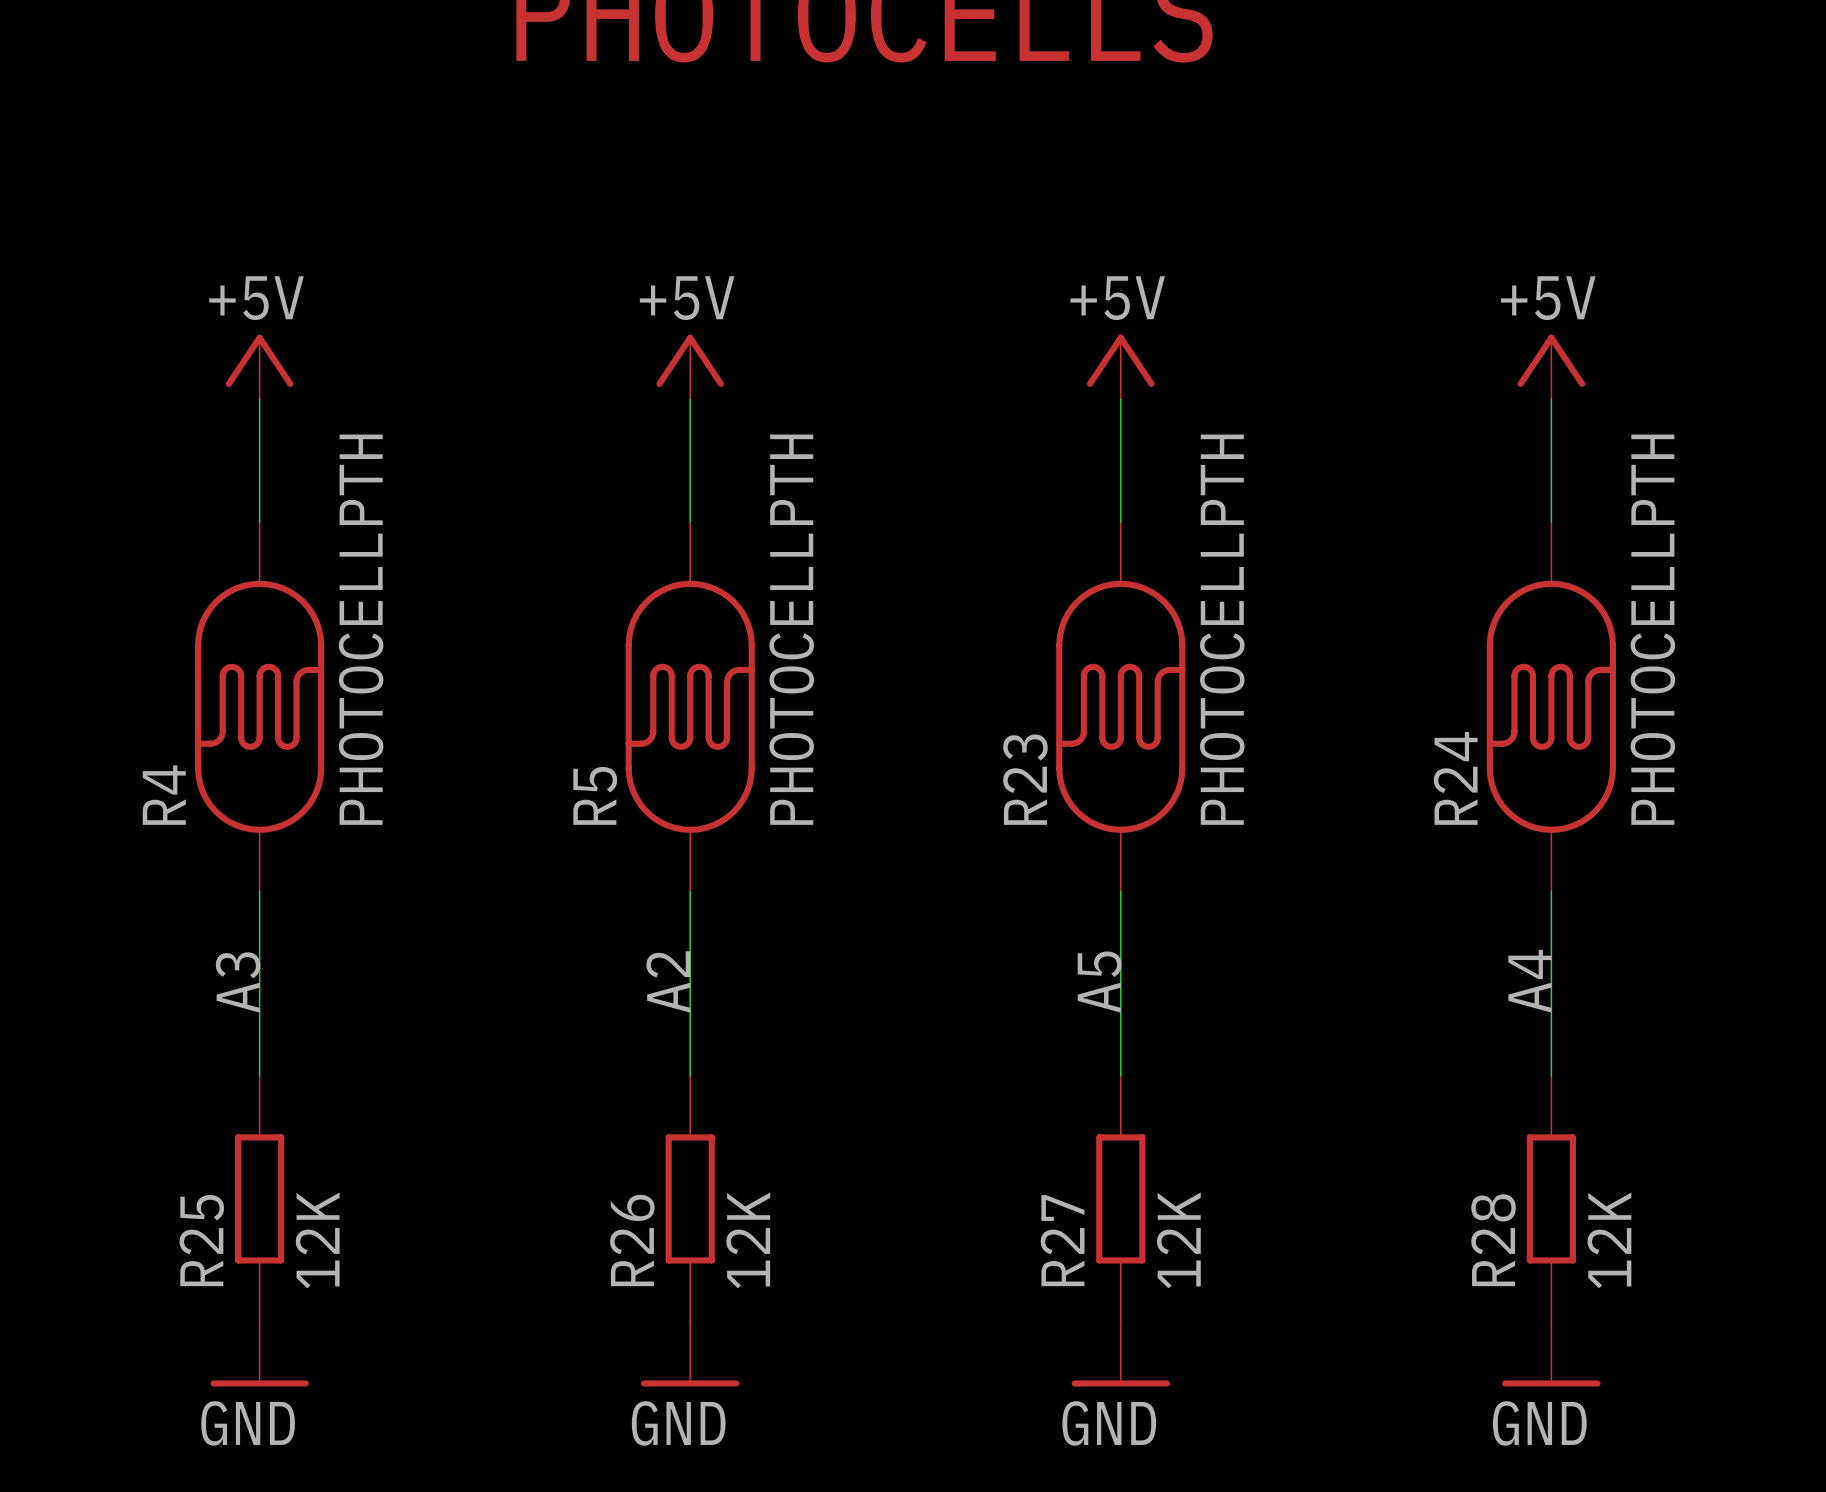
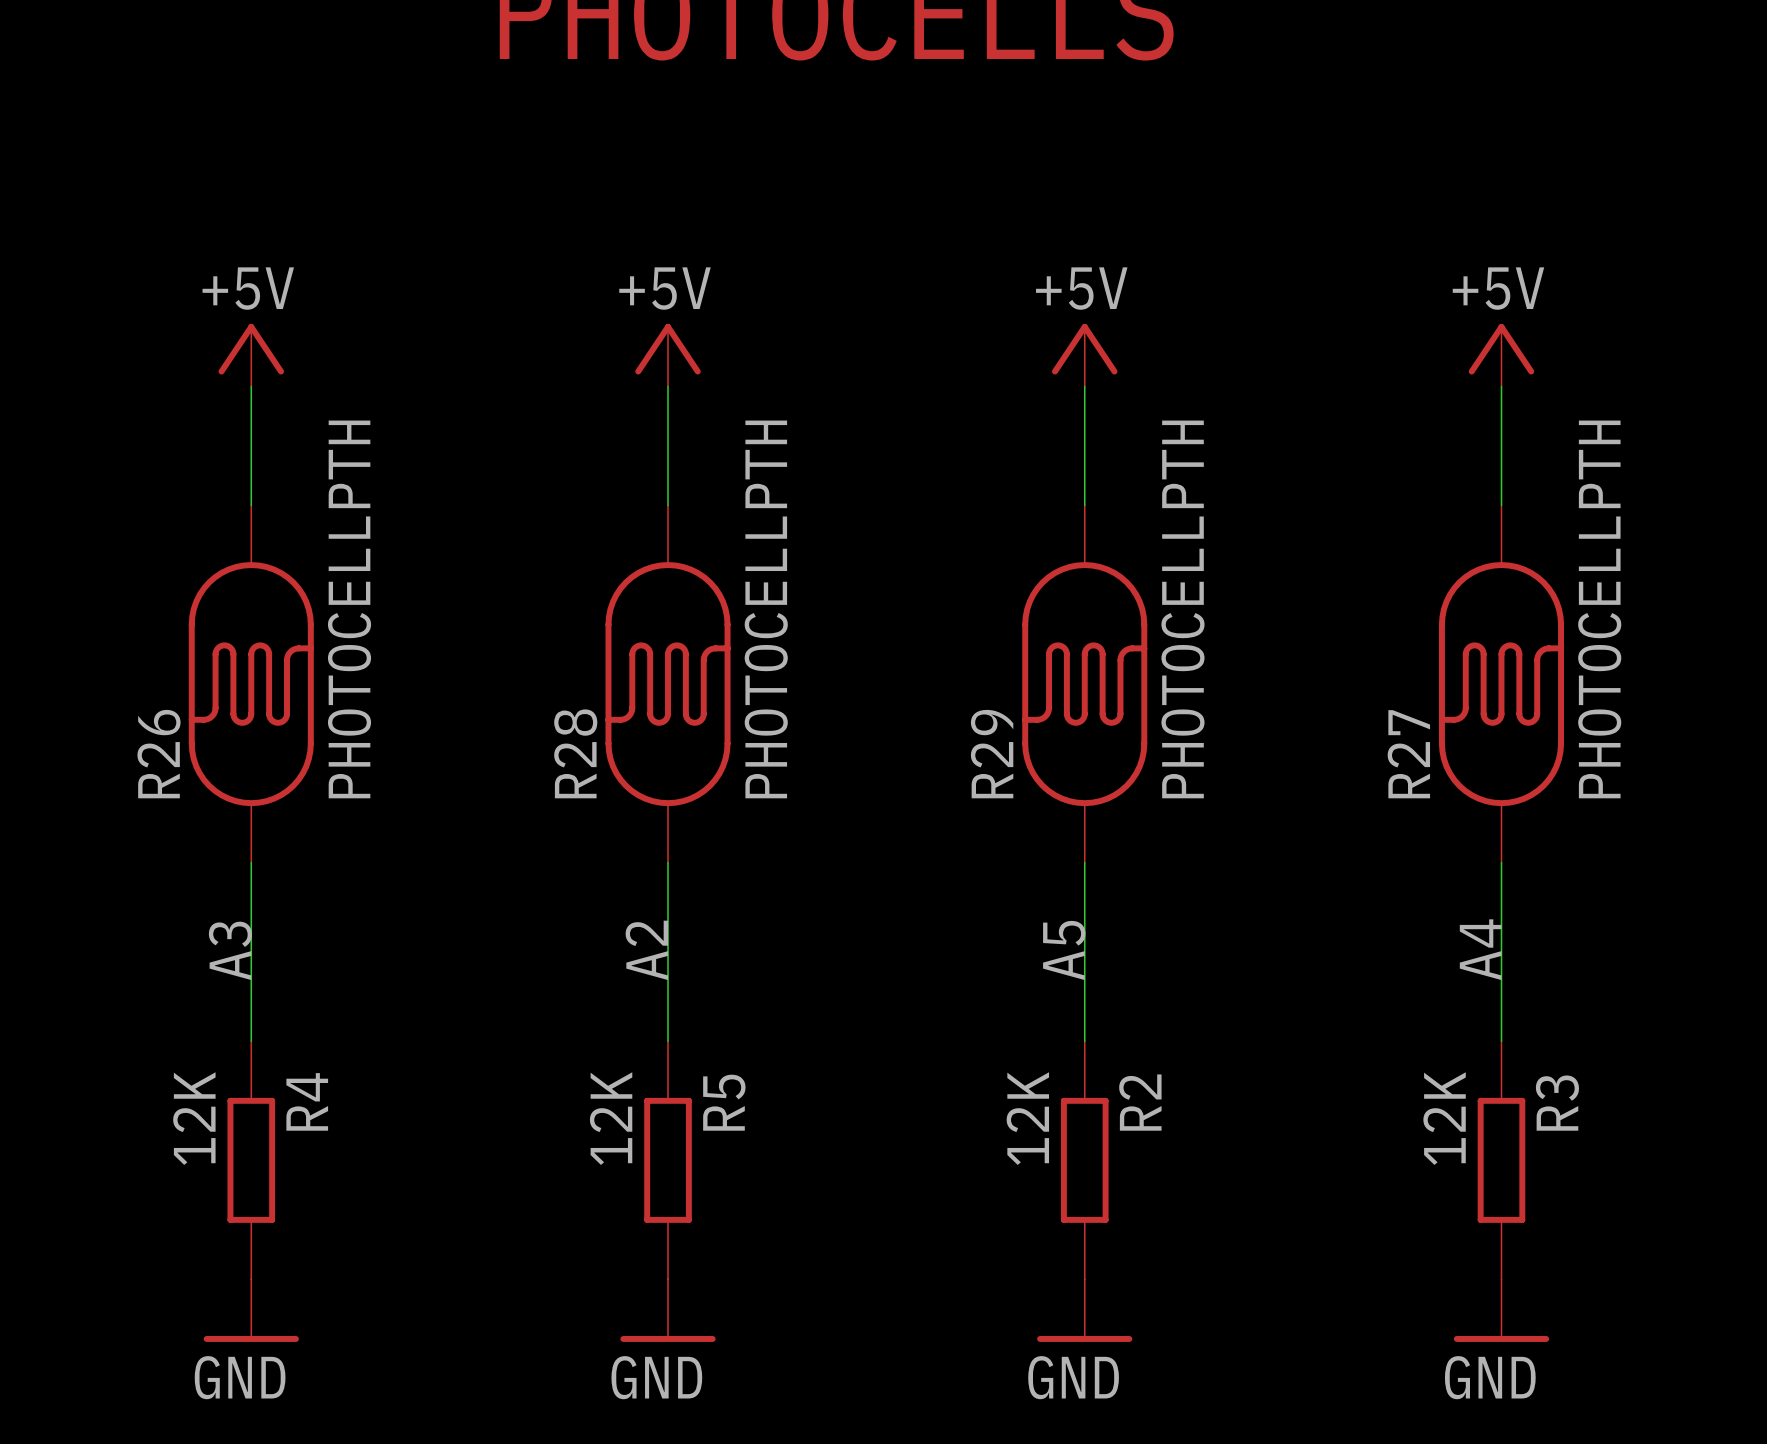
R24 name: R24 (1455, 778) -> R27 (1408, 754)
R23 name: R23 (1025, 779) -> R29 (992, 754)
R4 name: R4 (164, 795) -> R26 (159, 754)
R5 name: R5 (595, 795) -> R28 (575, 753)
R25 name: R25 (201, 1240) -> R4 (307, 1101)
R25 value position: 12K (317, 1240) -> 12K (194, 1118)
R26 name: R26 (632, 1240) -> R5 (724, 1102)
R26 value position: 12K (748, 1240) -> 12K (611, 1118)
R27 name: R27 (1062, 1240) -> R2 (1140, 1102)
R27 value position: 12K (1178, 1240) -> 12K (1027, 1118)
R28 name: R28 (1493, 1240) -> R3 (1557, 1103)
R28 value position: 12K (1609, 1240) -> 12K (1444, 1118)

